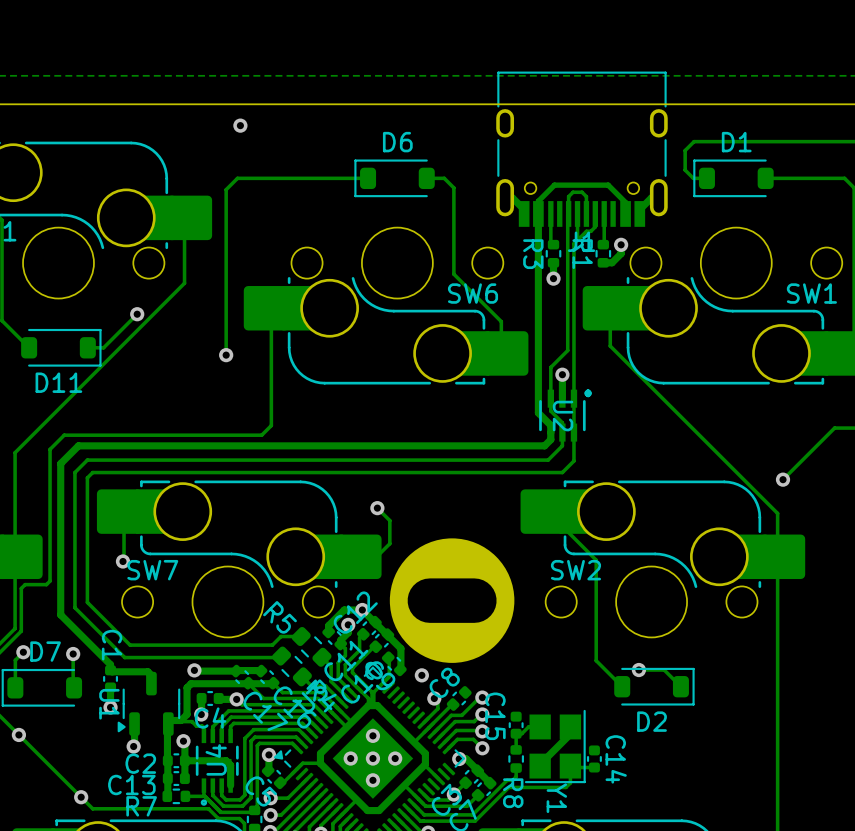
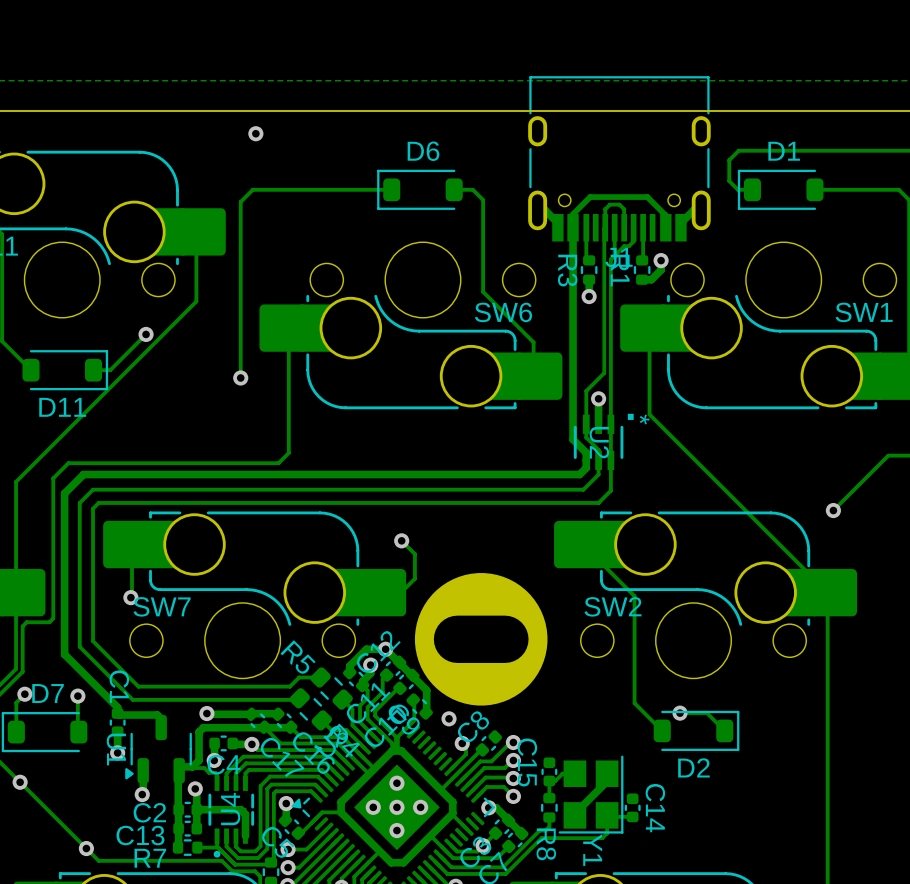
track: (610, 346) (777, 513) (777, 556) -> (649, 368) (649, 414) (827, 592)
U2 text: none -> * (644, 419)

